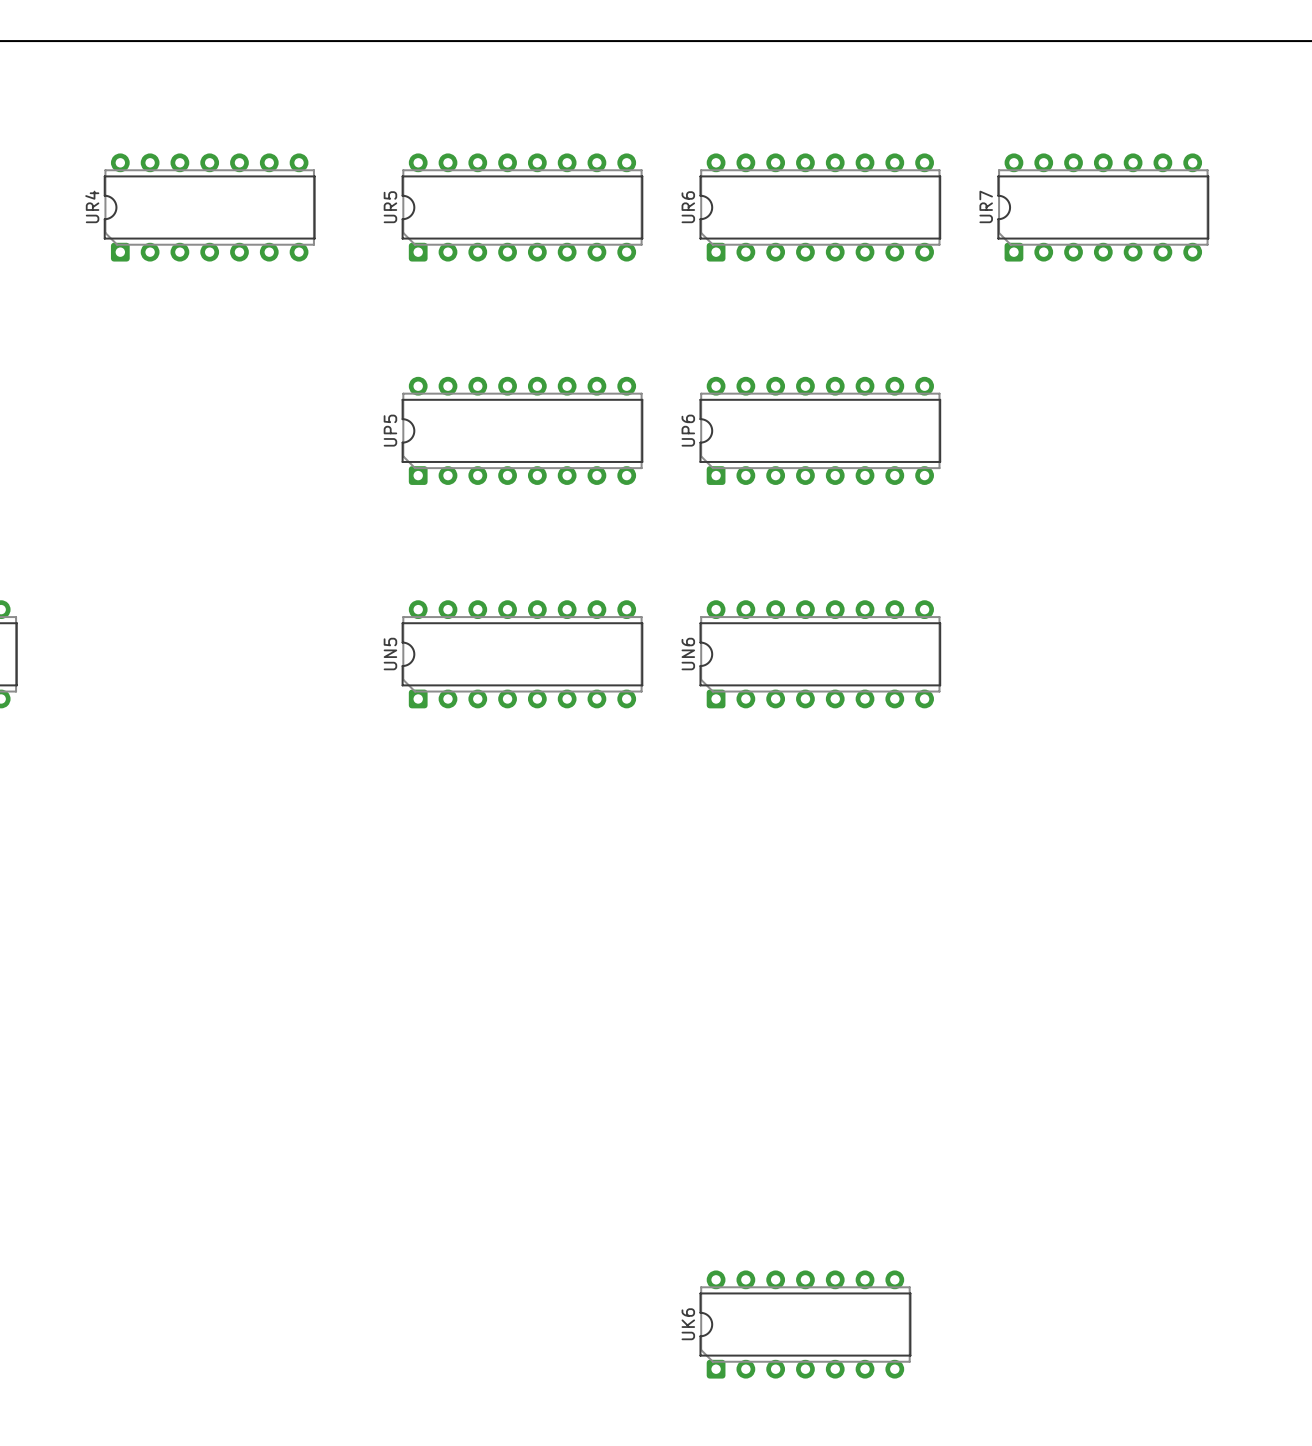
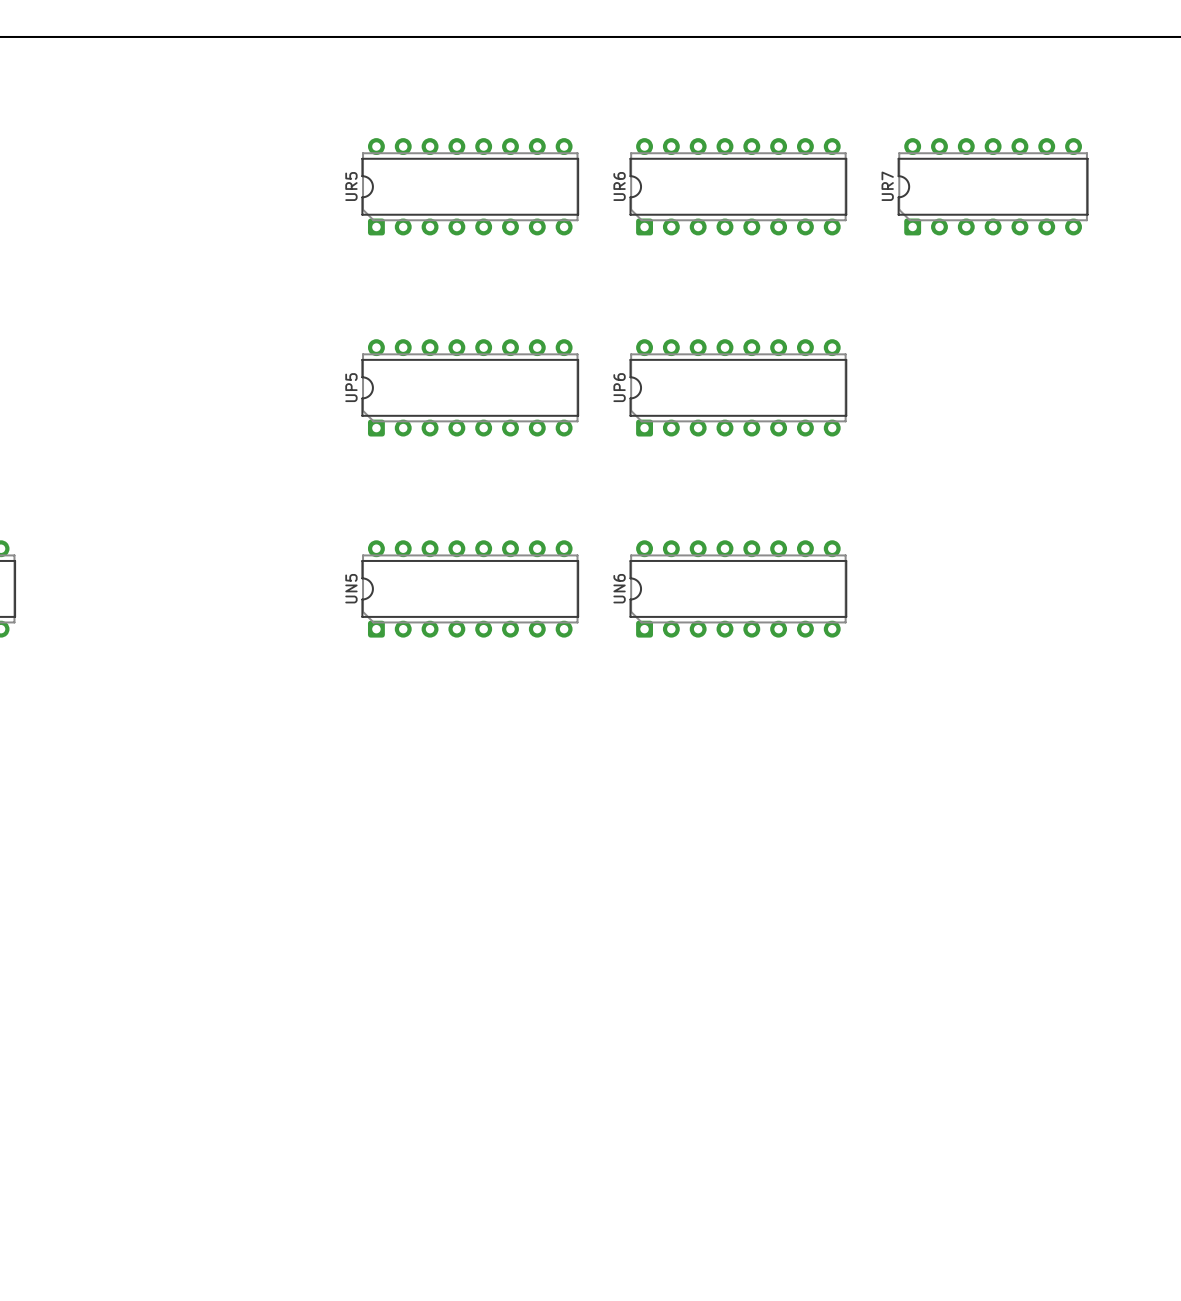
UR4: (209, 207) -> none
UK6: (805, 1324) -> none

